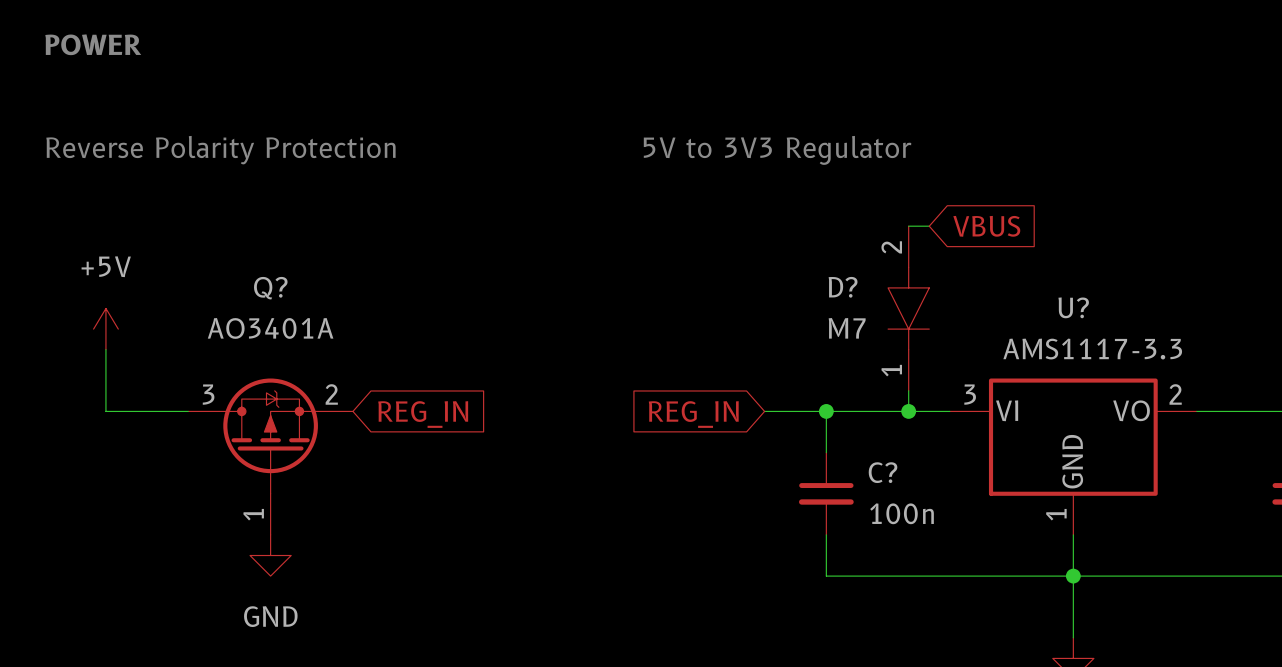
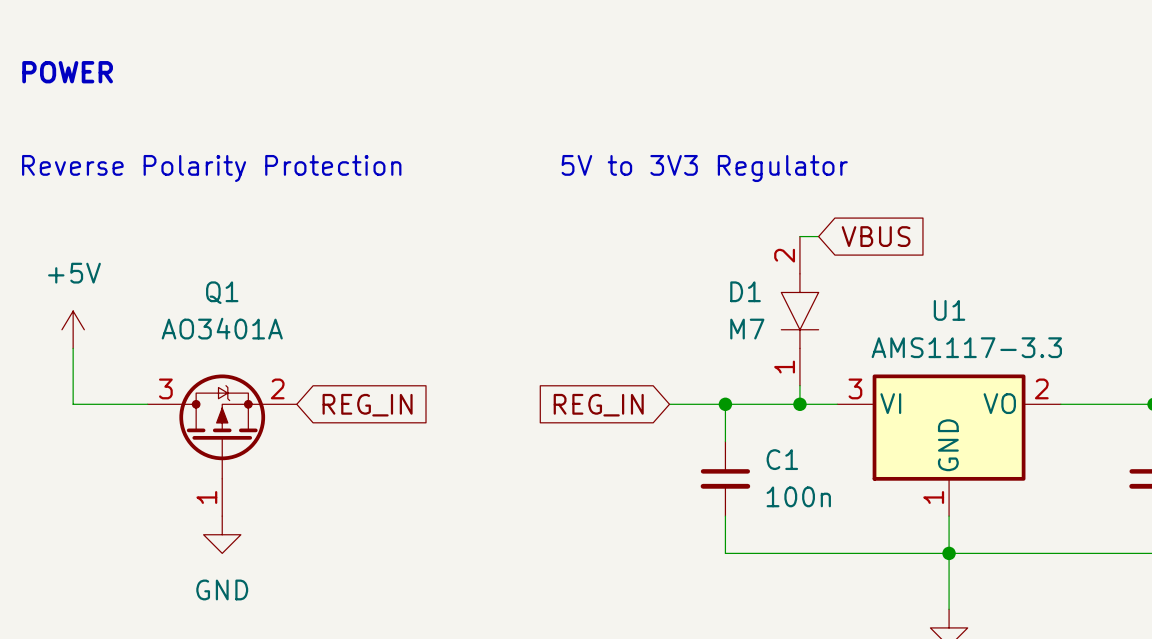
D? name: D? (843, 287) -> D1 (745, 291)
Q? name: Q? (270, 288) -> Q1 (222, 292)
U? name: U? (1073, 307) -> U1 (949, 310)
C? name: C? (883, 472) -> C1 (782, 459)

